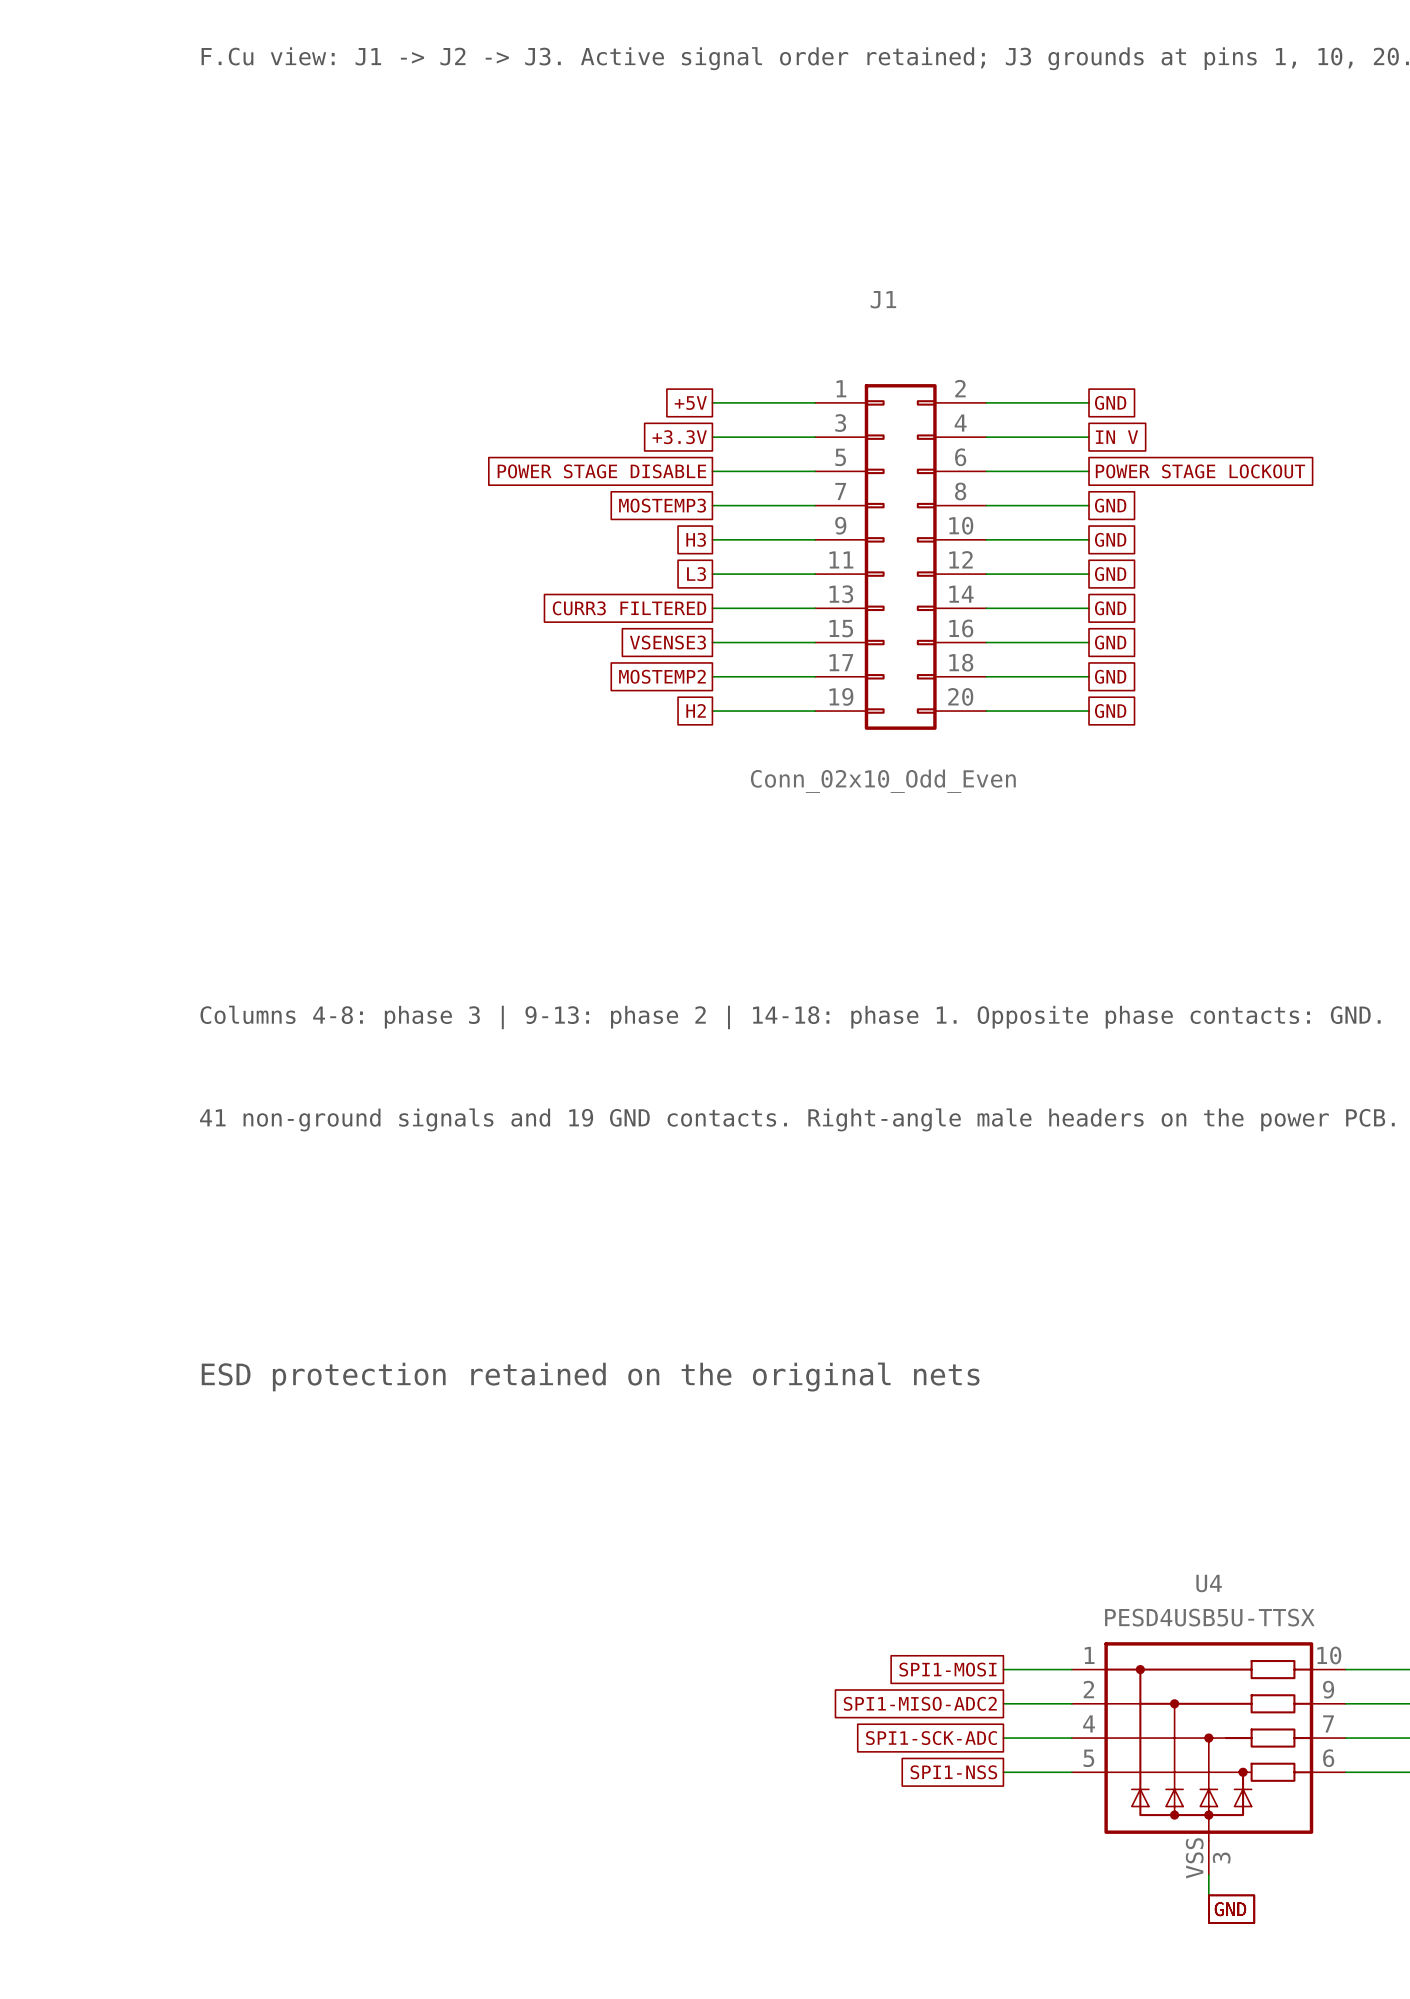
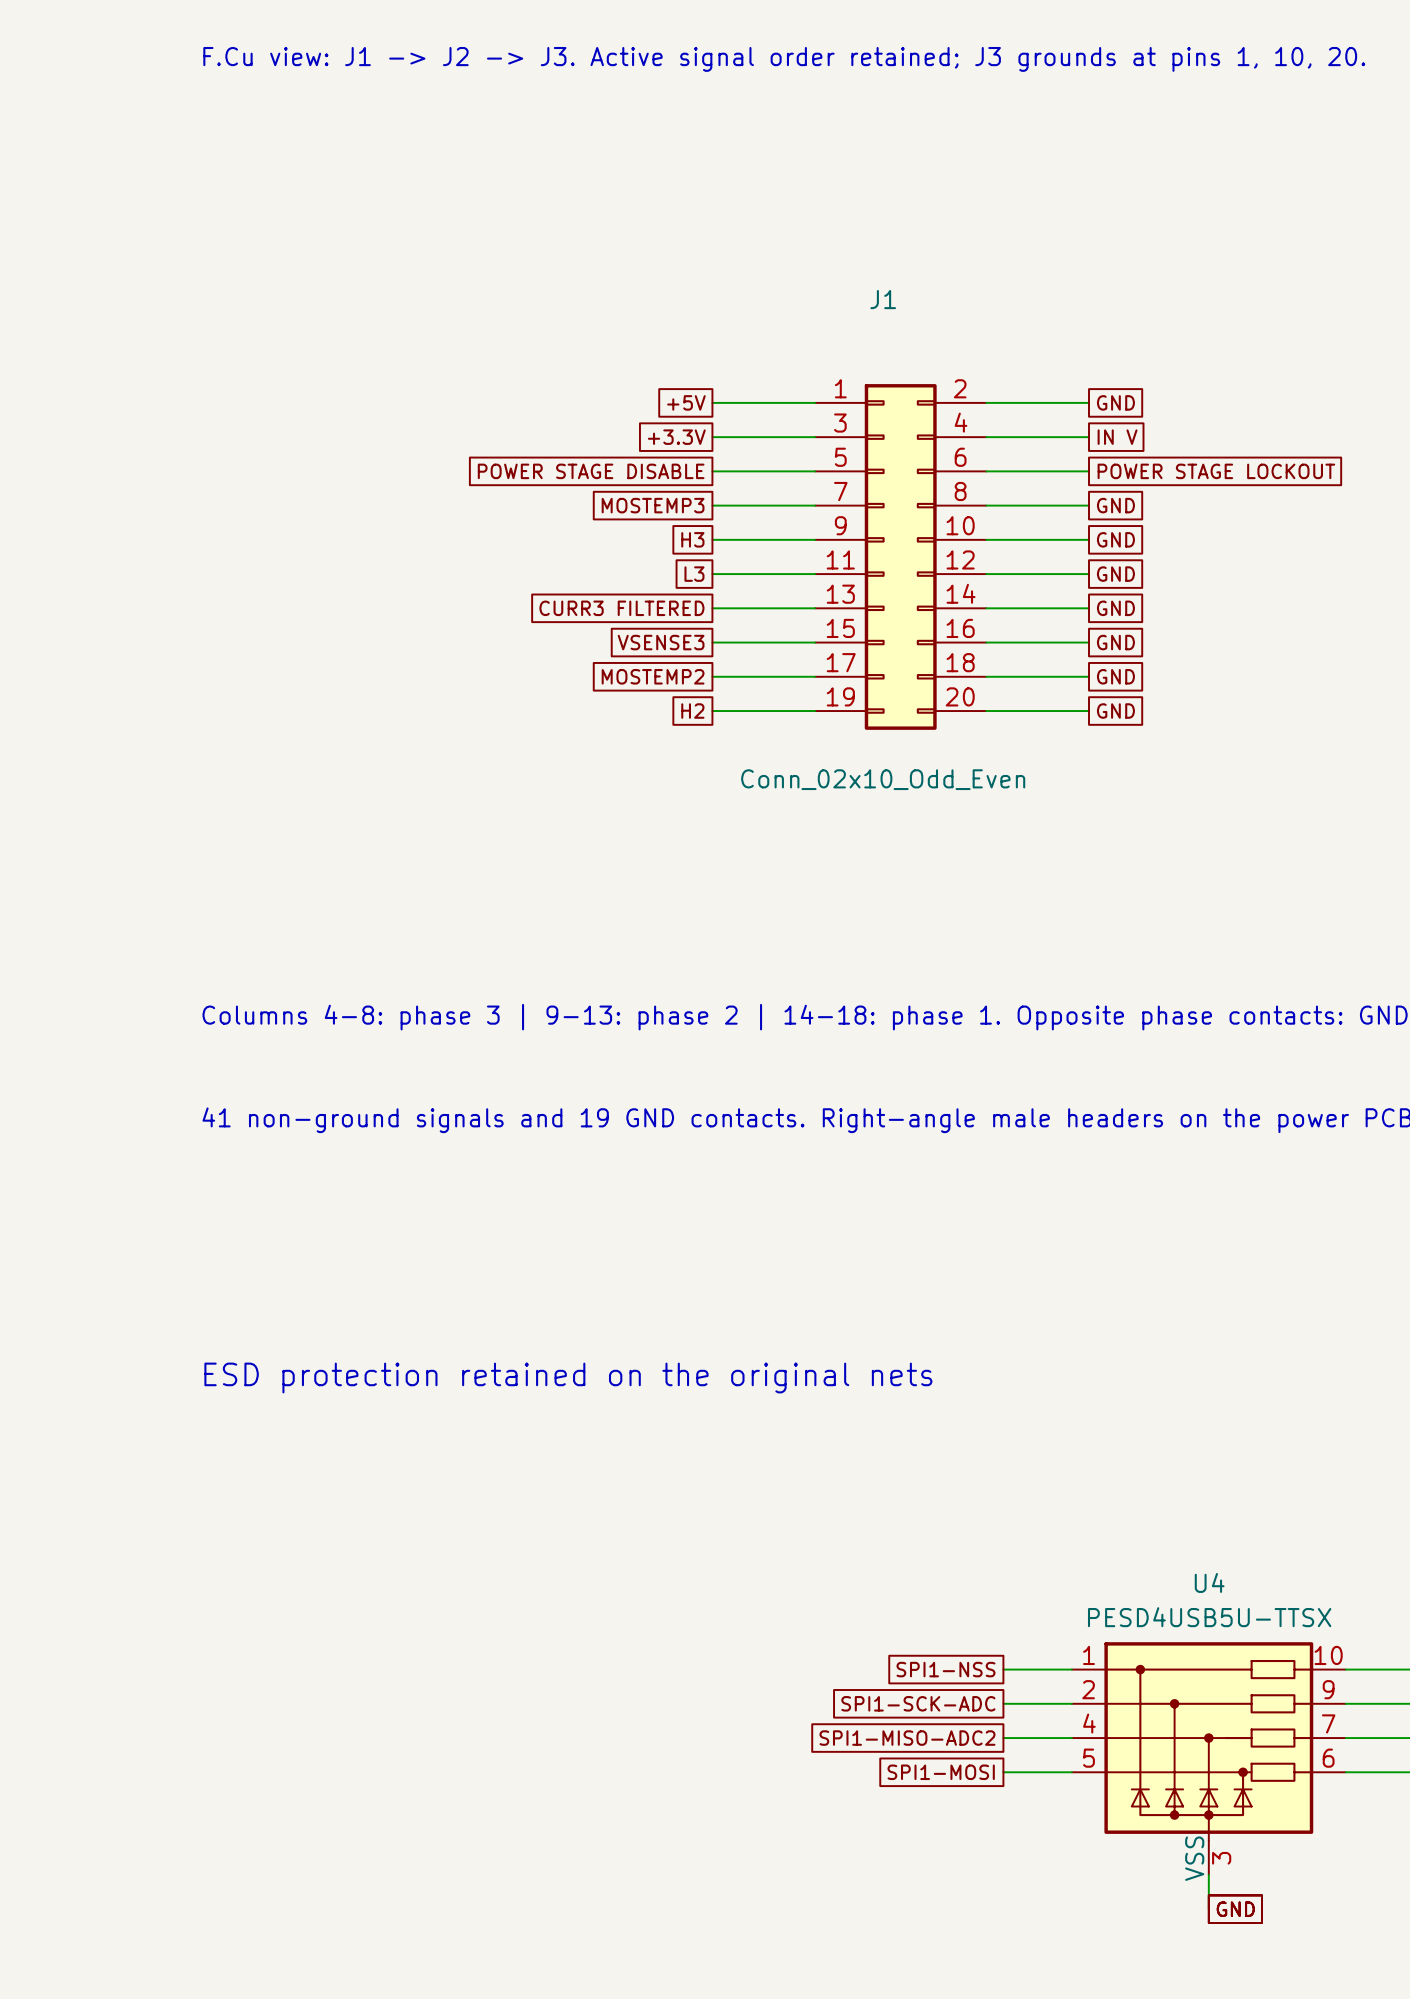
global label: SPI1-MOSI (947, 1669) -> SPI1-NSS (945, 1669)
global label: SPI1-MISO-ADC2 (920, 1703) -> SPI1-SCK-ADC (918, 1703)
global label: SPI1-SCK-ADC (931, 1738) -> SPI1-MISO-ADC2 (907, 1738)
global label: SPI1-NSS (953, 1772) -> SPI1-MOSI (941, 1772)

